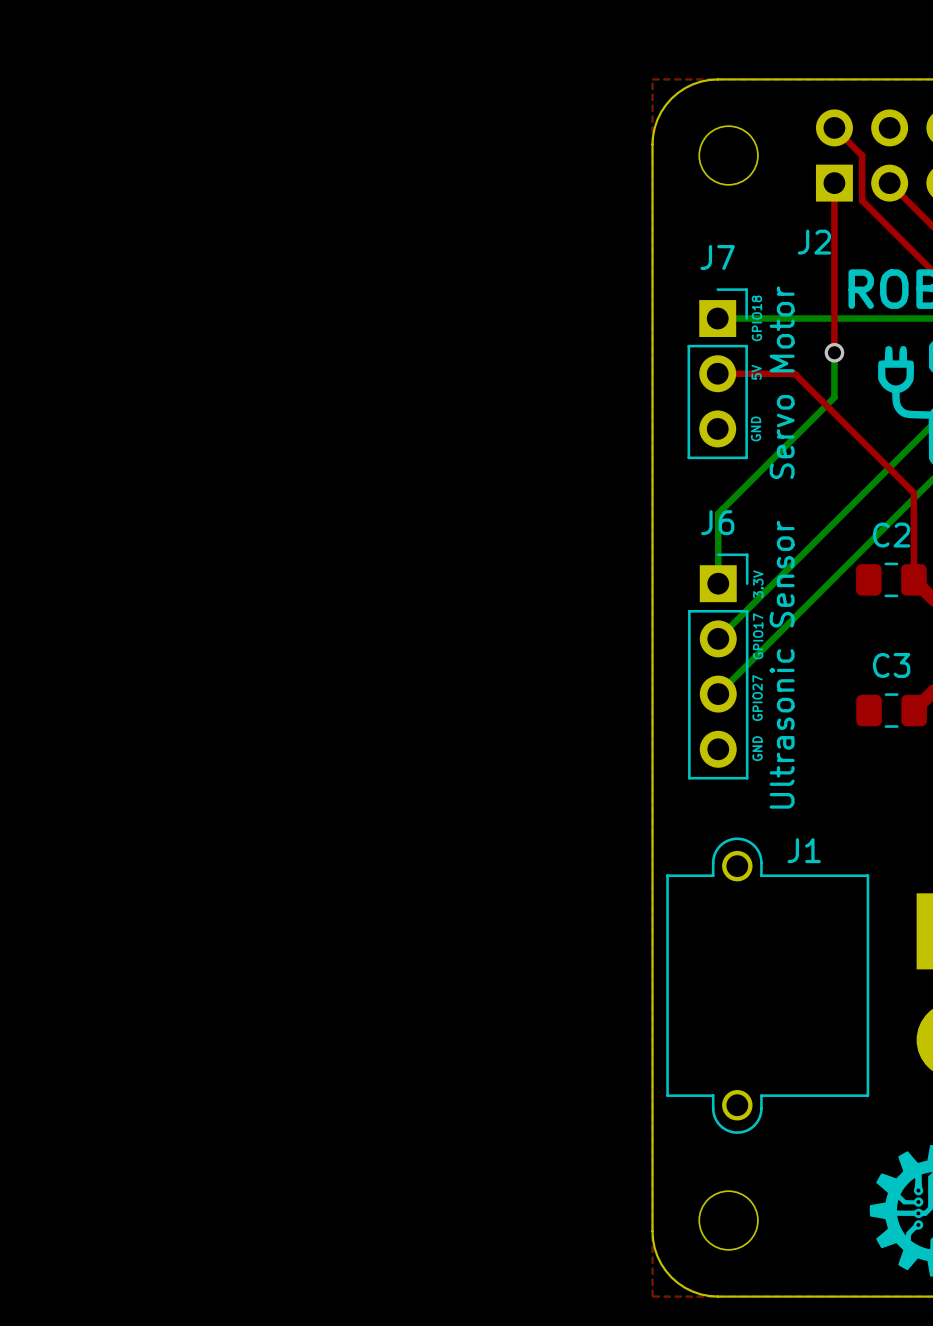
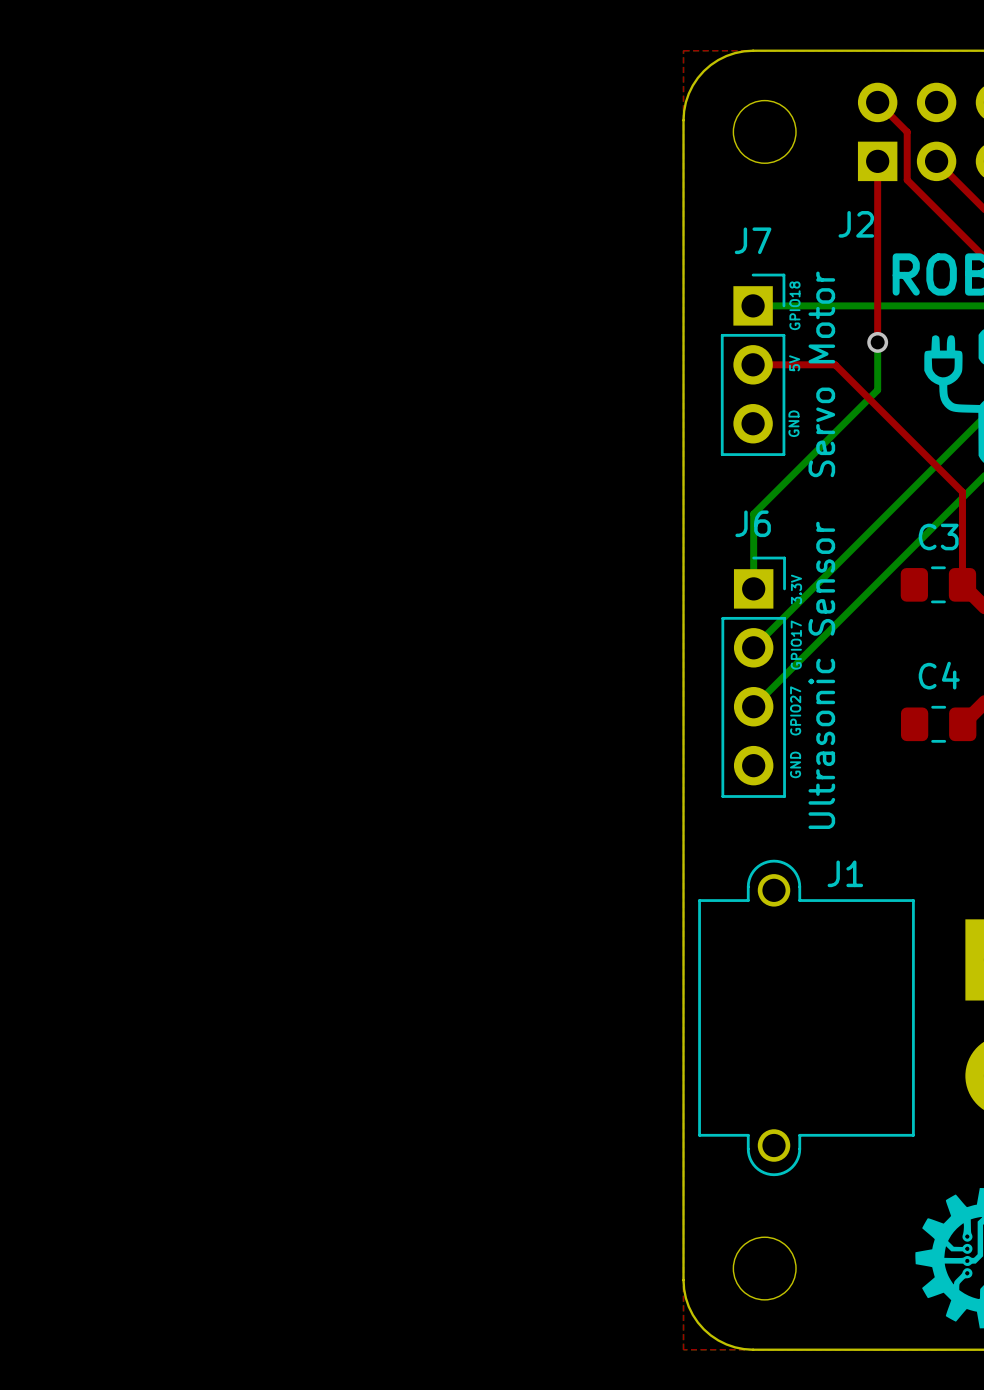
C2 name: C2 (891, 535) -> C3 (938, 536)
C3 name: C3 (891, 665) -> C4 (939, 675)

